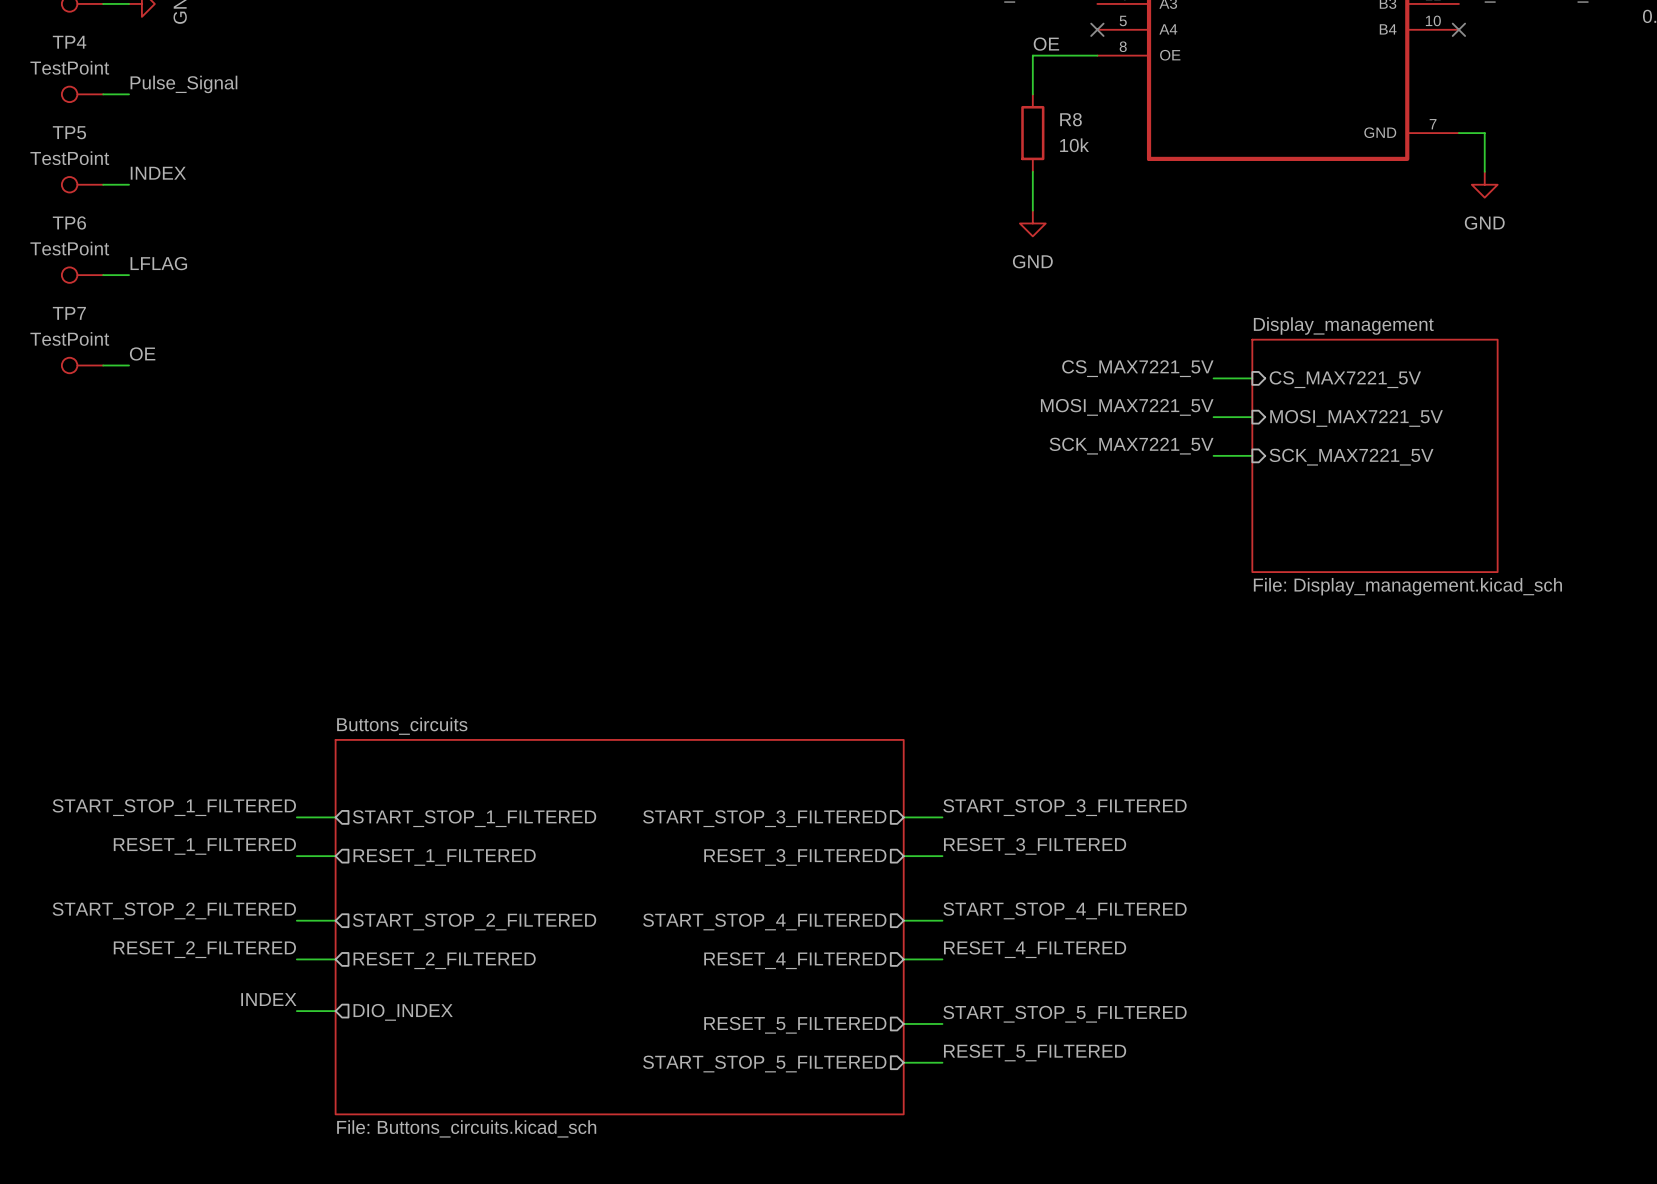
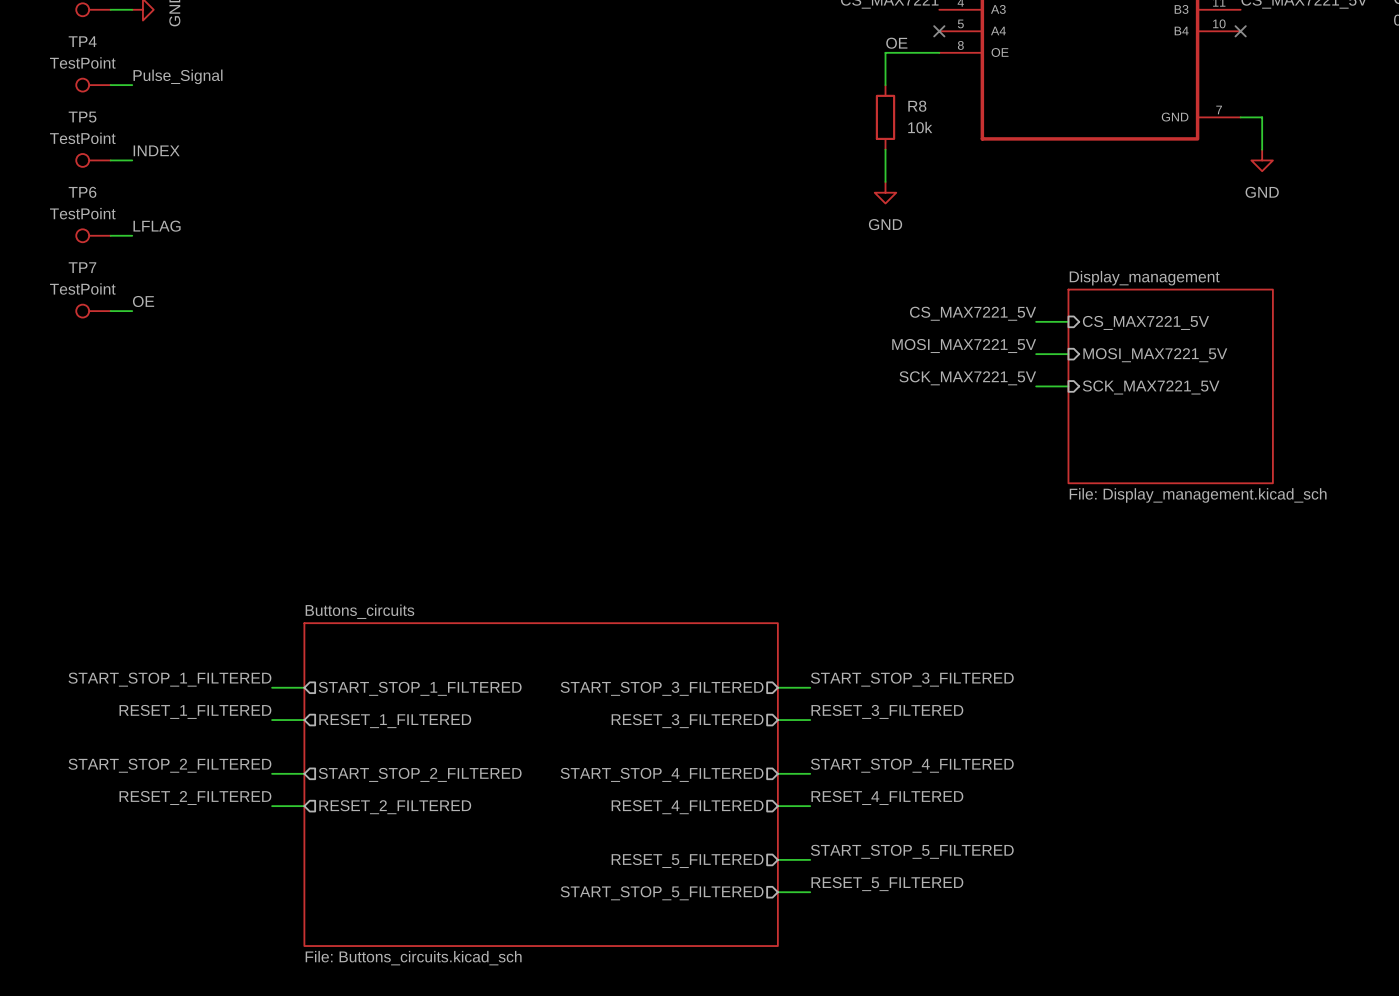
sheet Buttons_circuits shape: [334, 739, 905, 1116] -> [303, 622, 779, 947]
label: INDEX (268, 999) -> none
wire: (296, 1011) (335, 1011) -> none
sheet pin: DIO_INDEX (403, 1012) -> none

